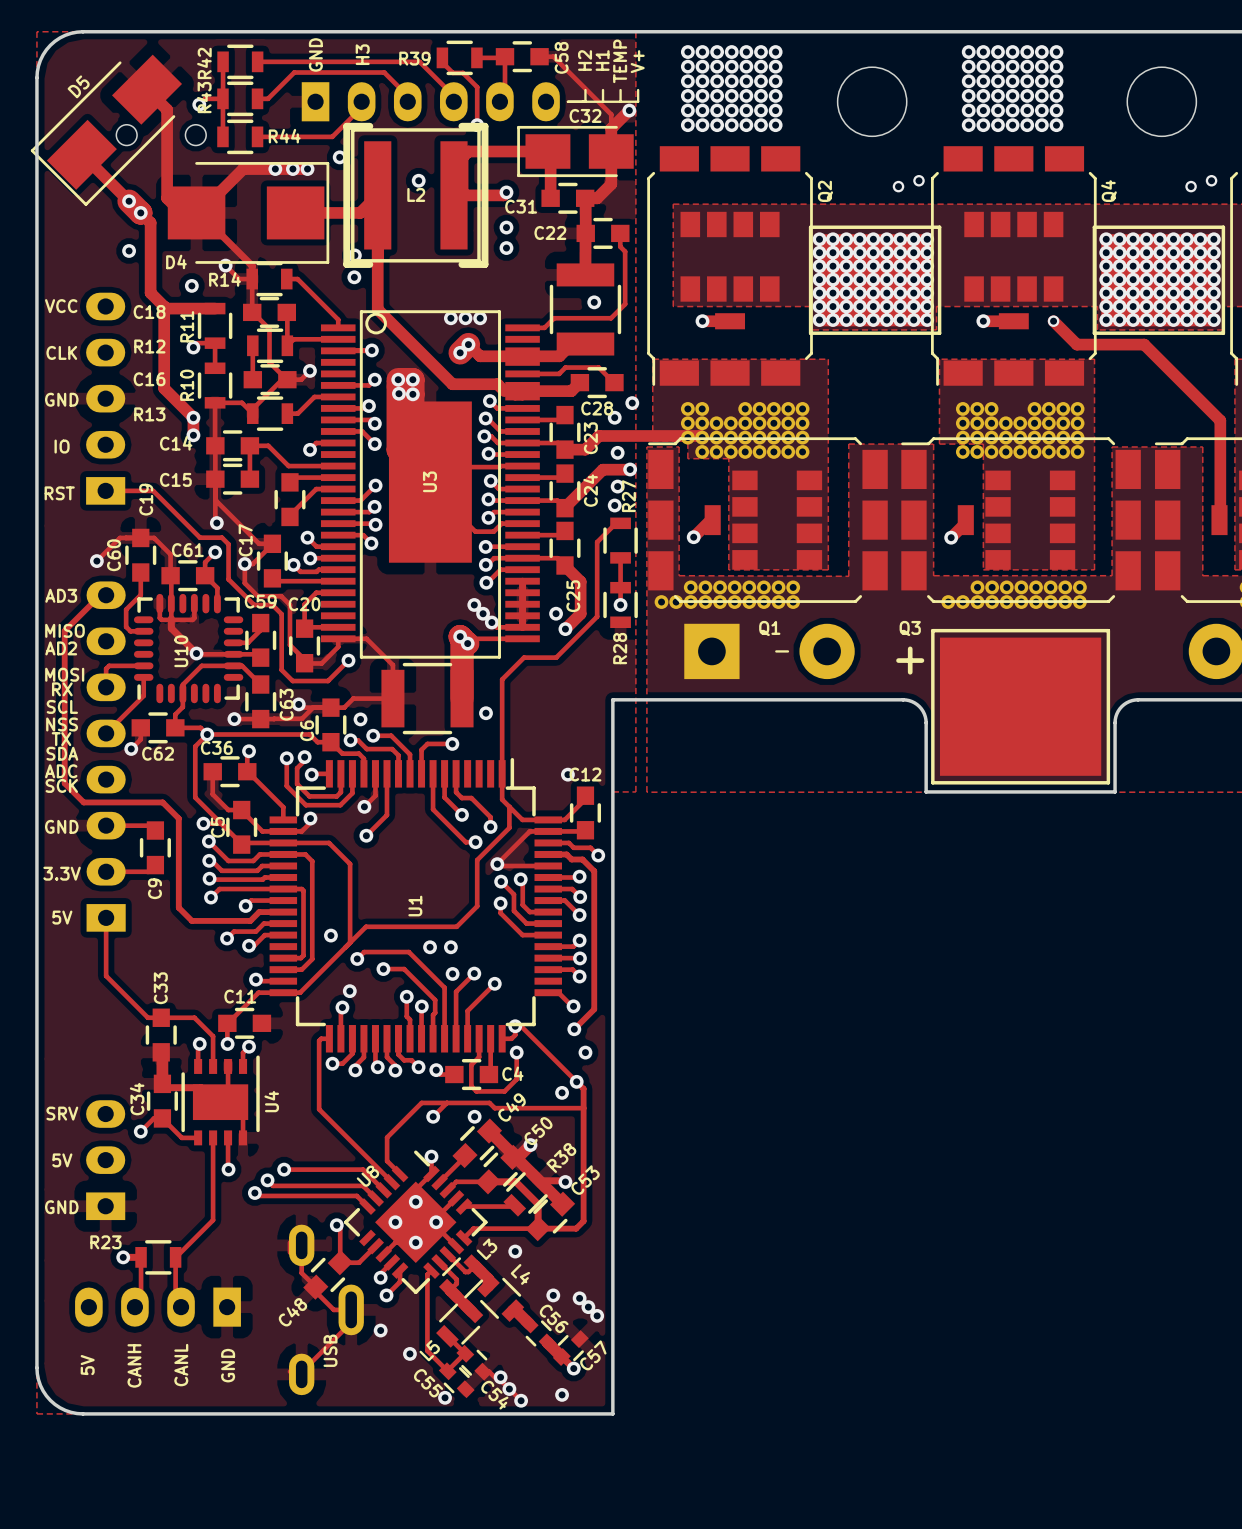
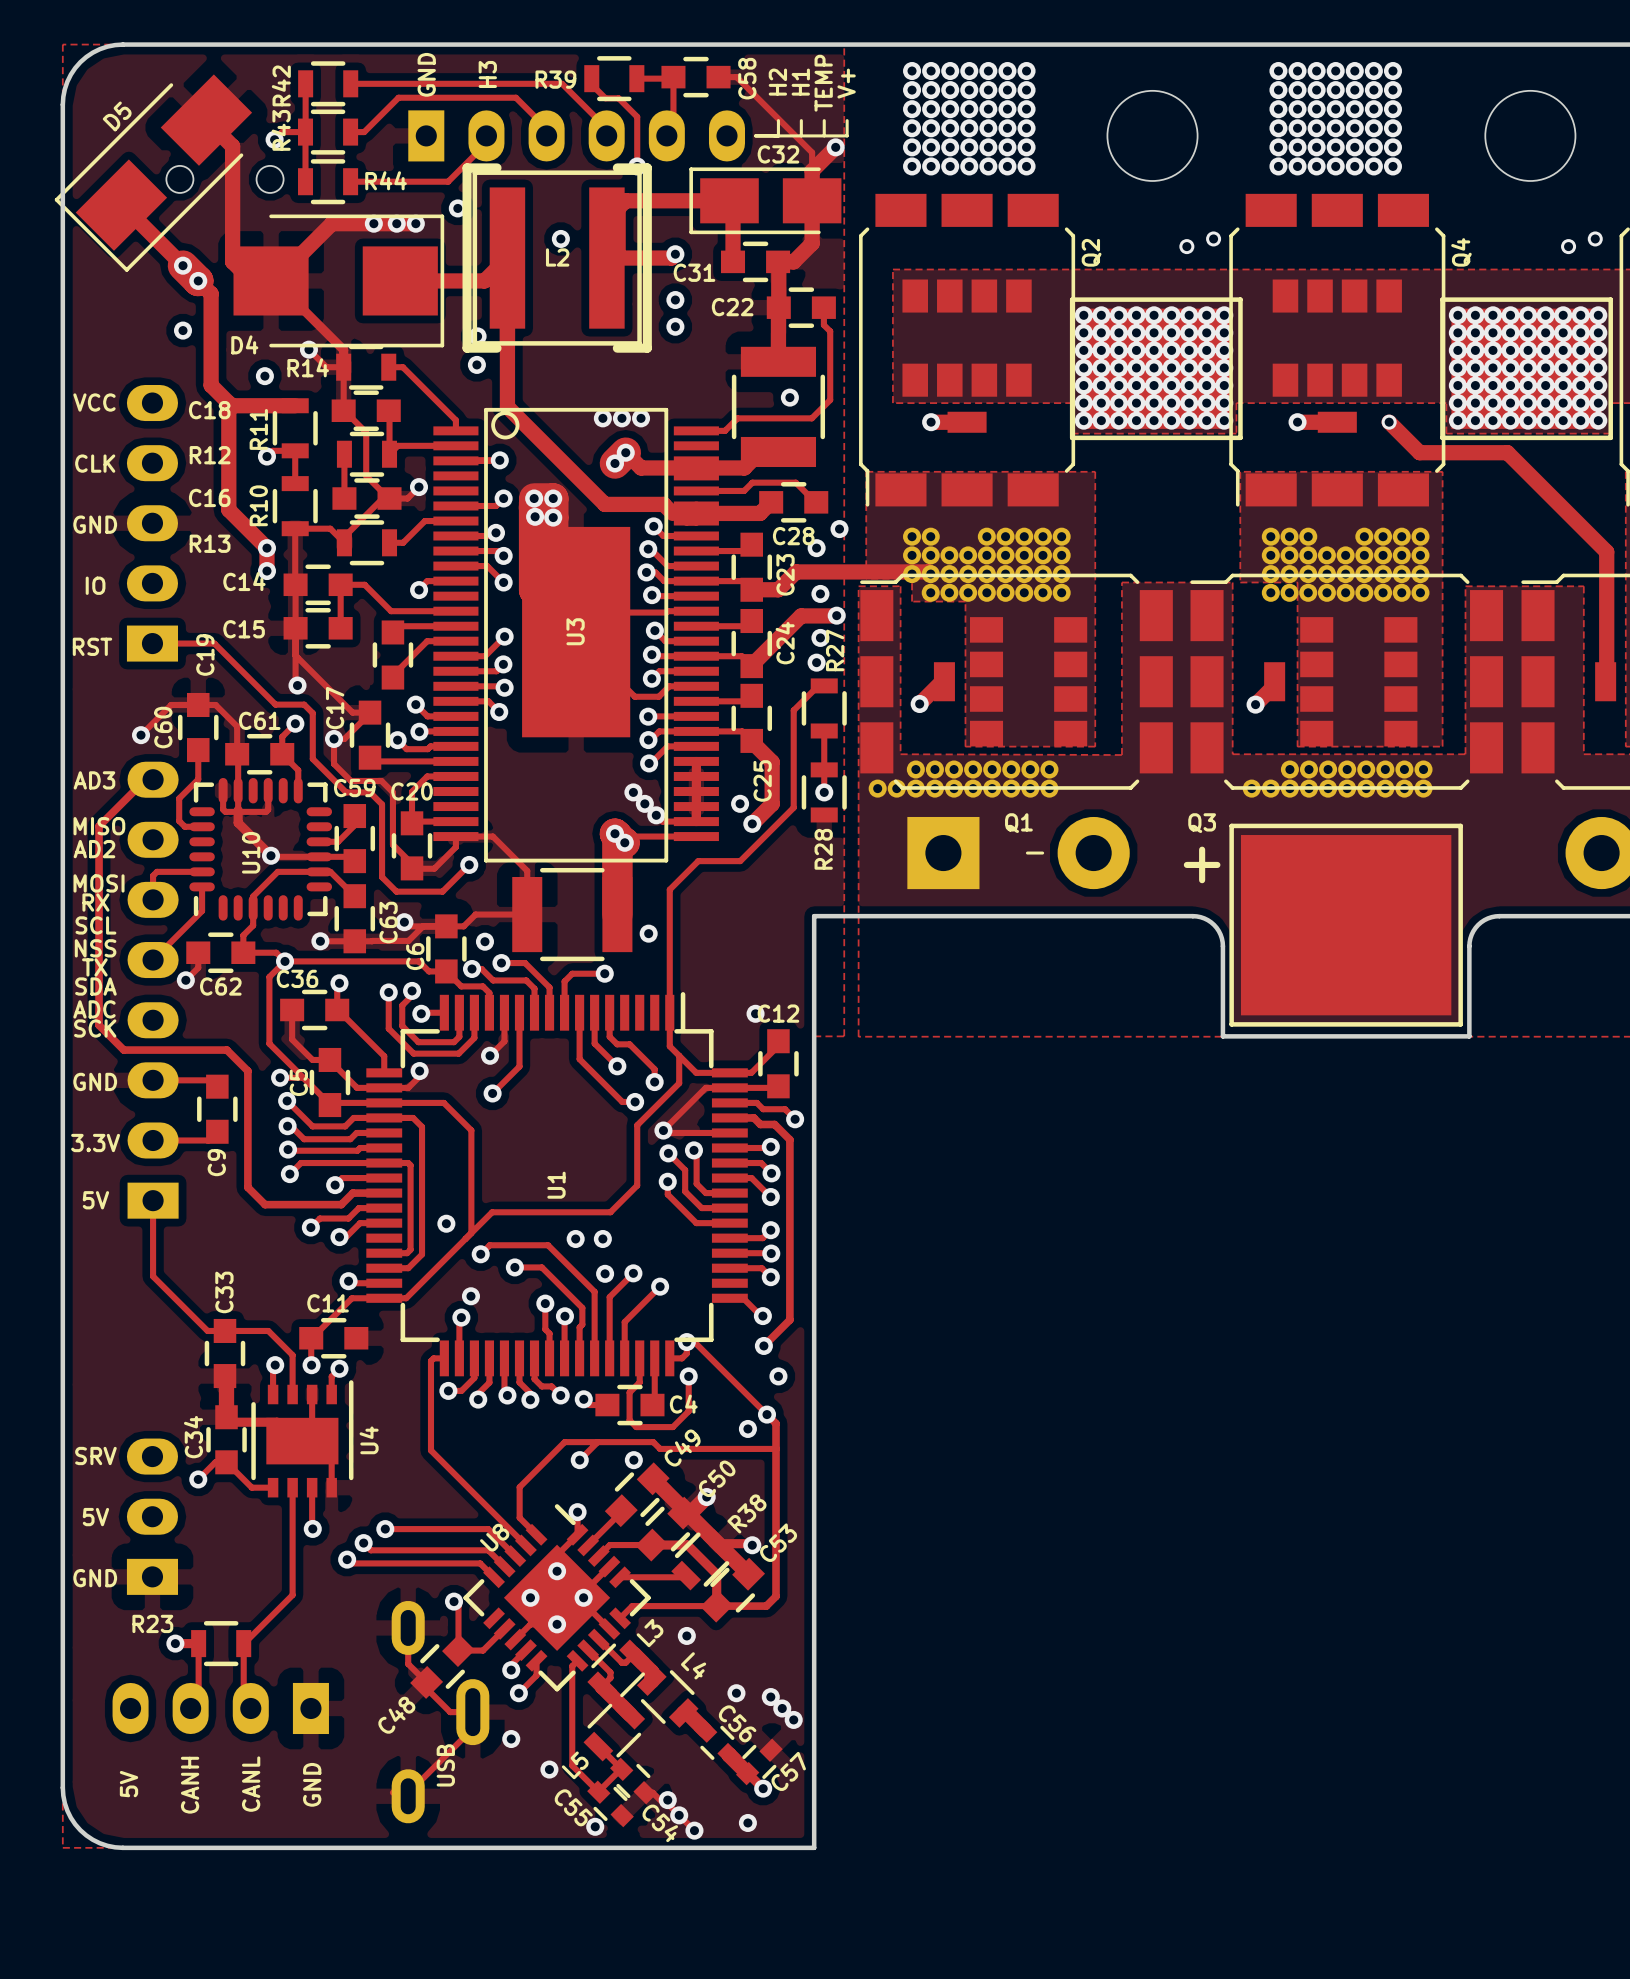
track: (289, 1242) (289, 1252) -> none

